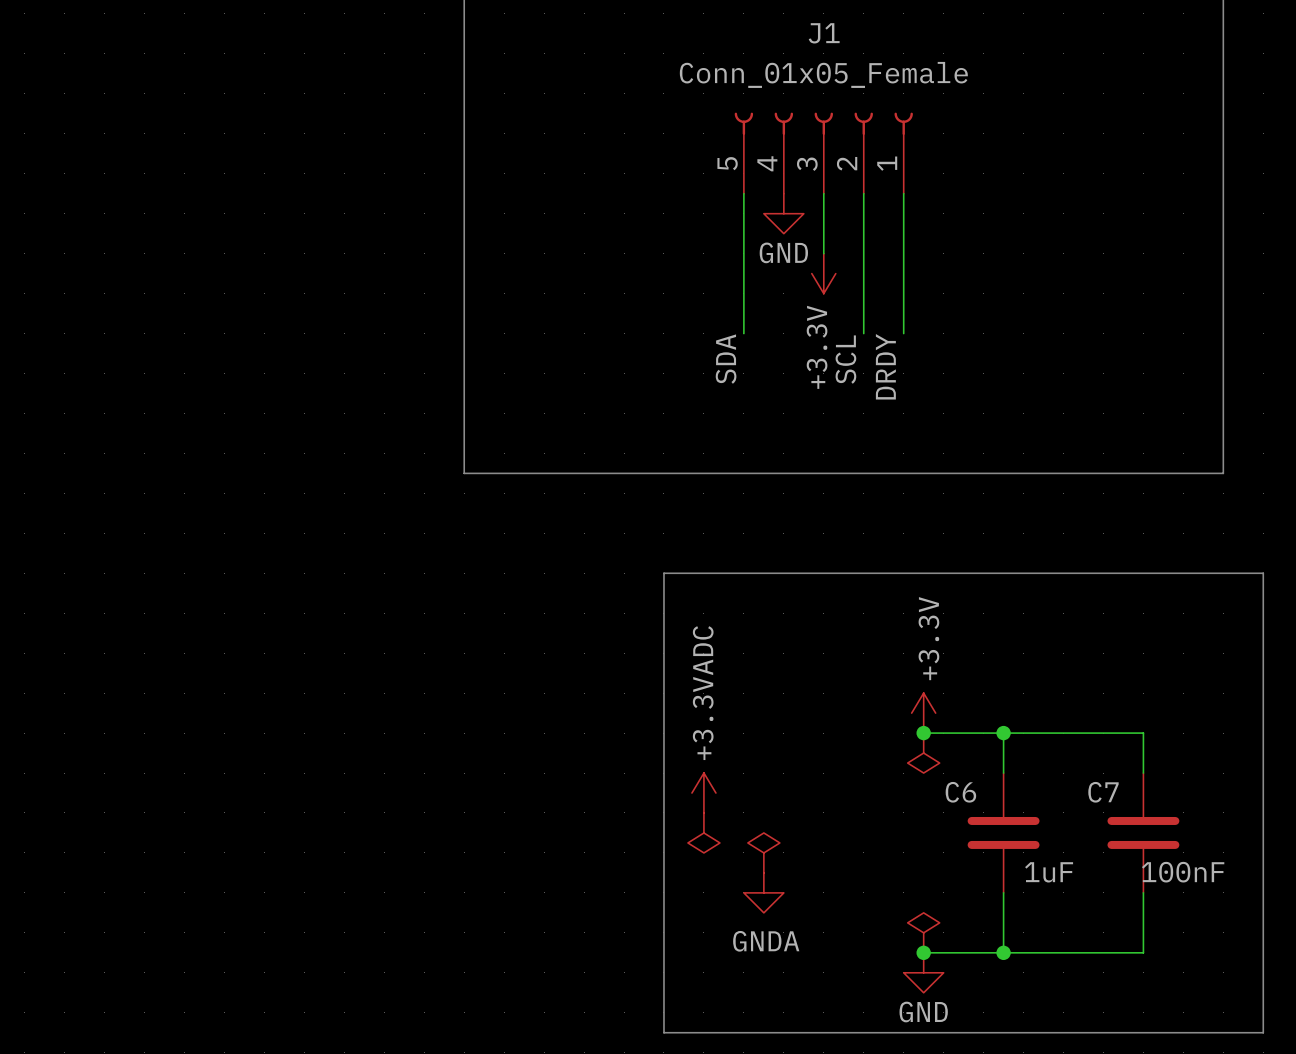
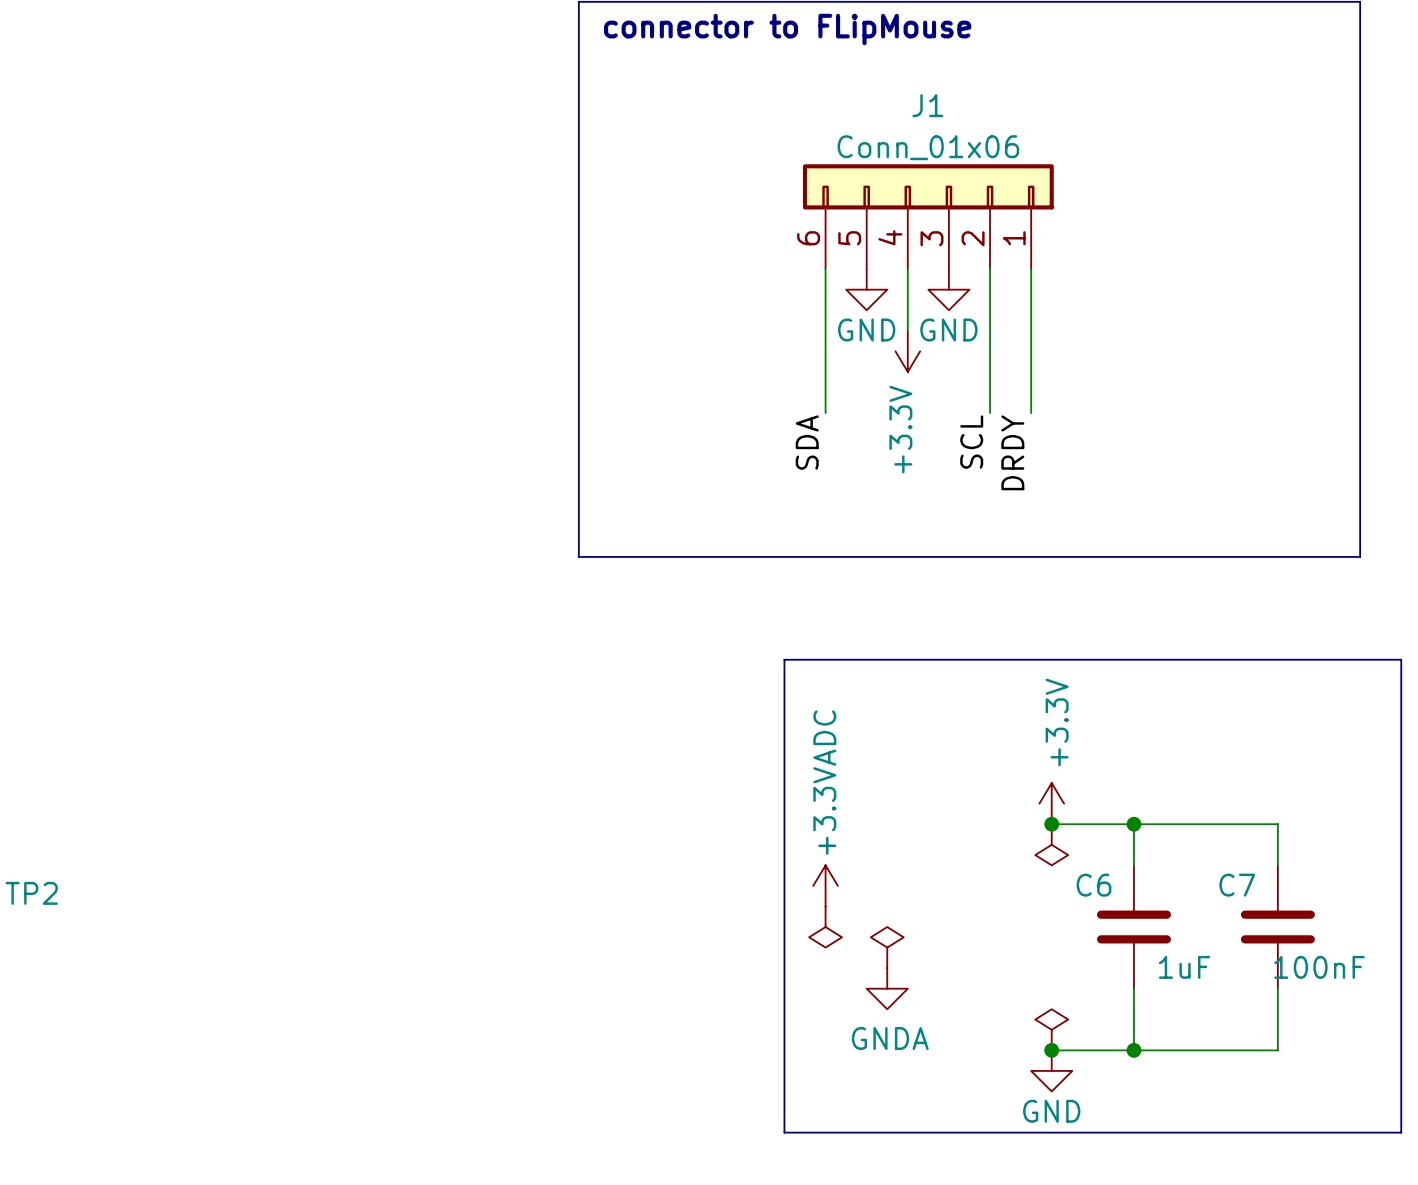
J1 value: Conn_01x05_Female (823, 74) -> Conn_01x06 (928, 147)
J1 symbol: [734, 112, 913, 194] -> [802, 164, 1054, 270]
wire: (743, 193) (743, 333) -> (825, 269) (825, 413)
wire: (823, 193) (823, 253) -> (907, 269) (907, 330)
power symbol: none -> GND (866, 289)
power symbol: GND (783, 213) -> none
power symbol: none -> GND (948, 289)
power symbol position: +3.3V (823, 273) -> +3.3V (907, 351)
label position: SDA (726, 359) -> SDA (807, 442)

